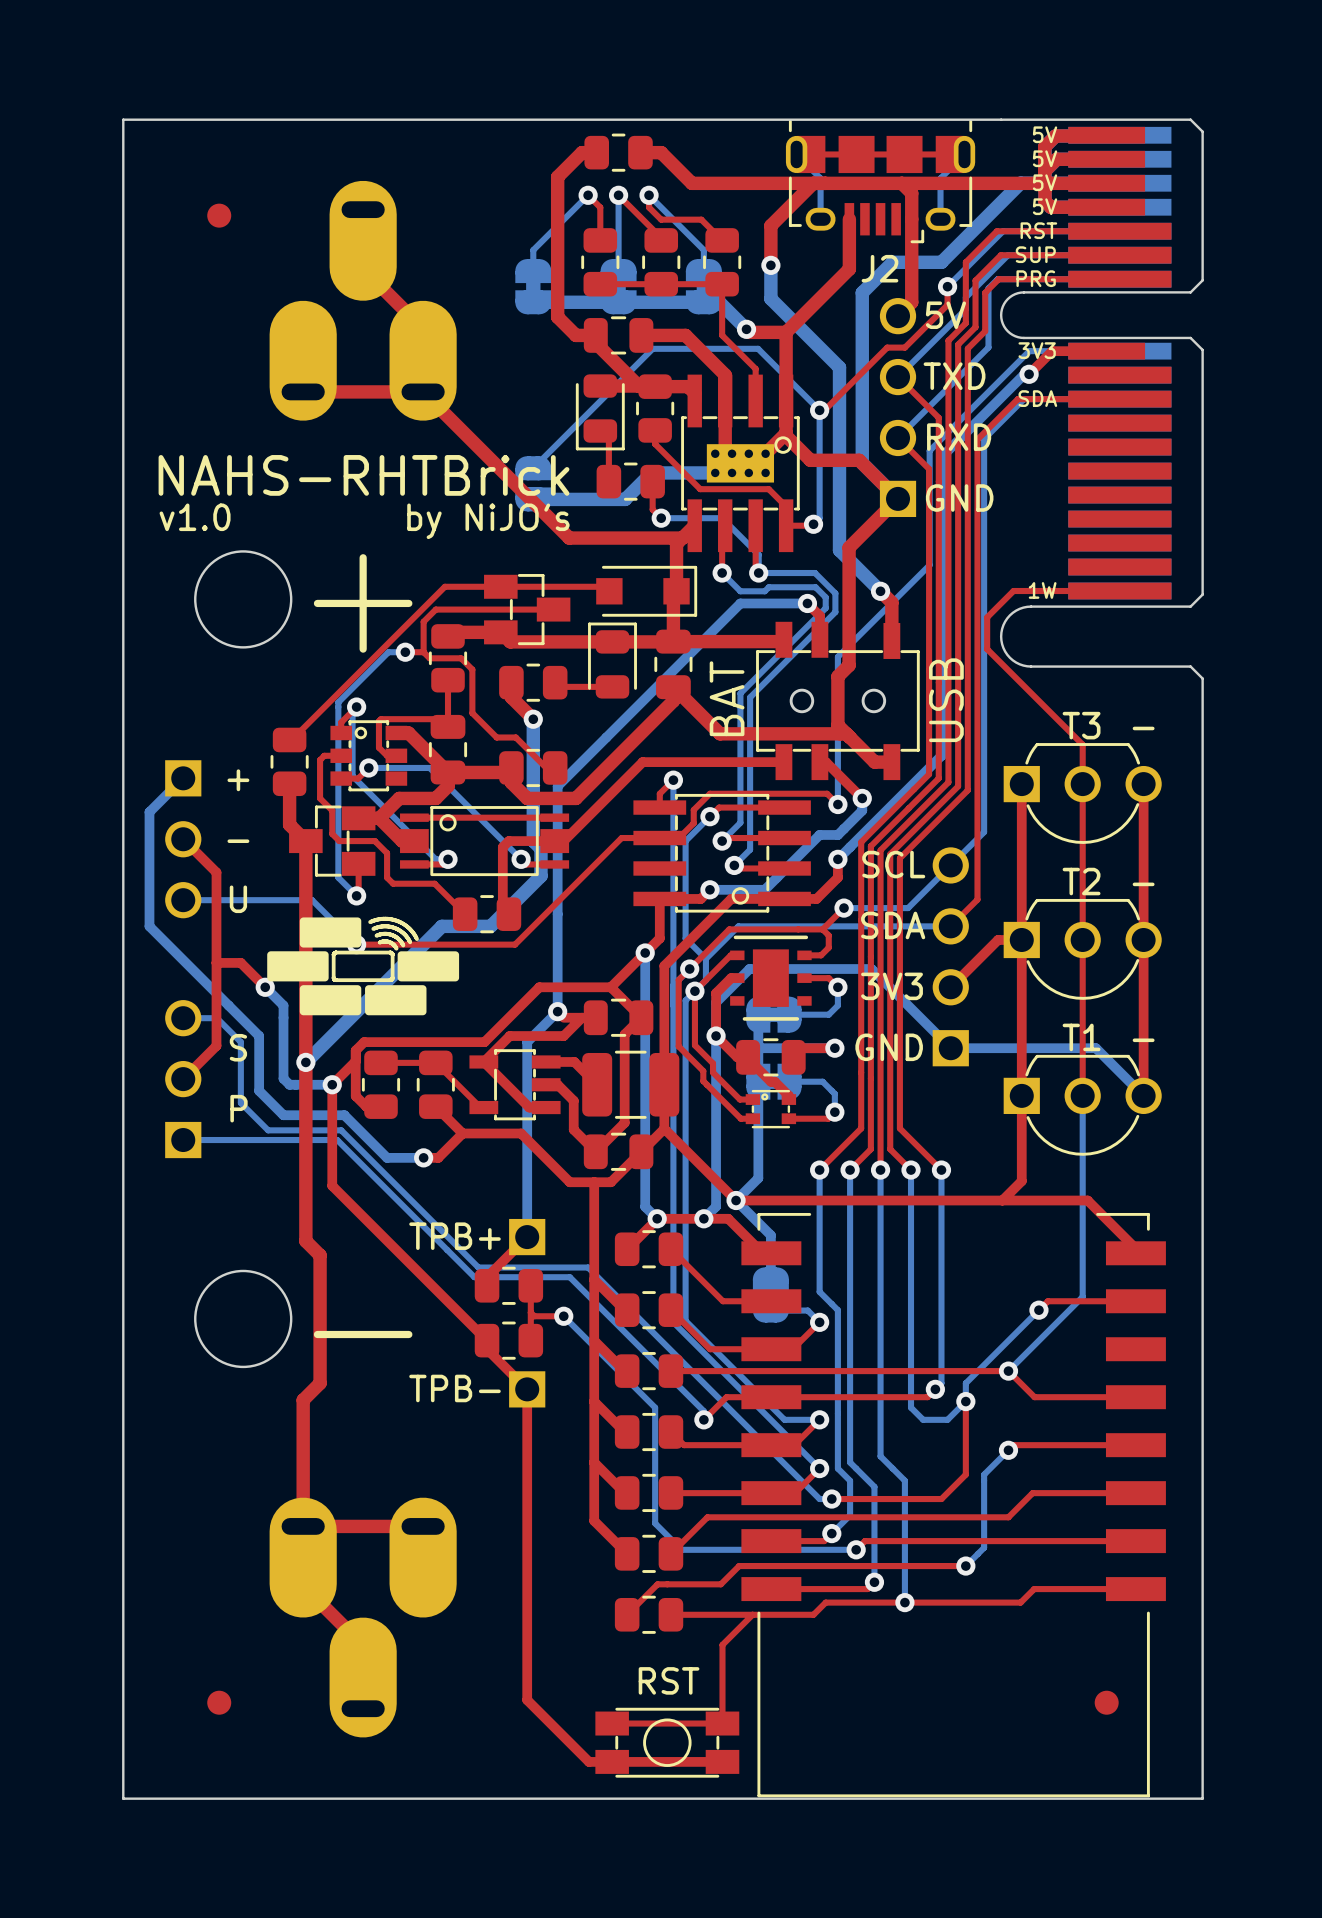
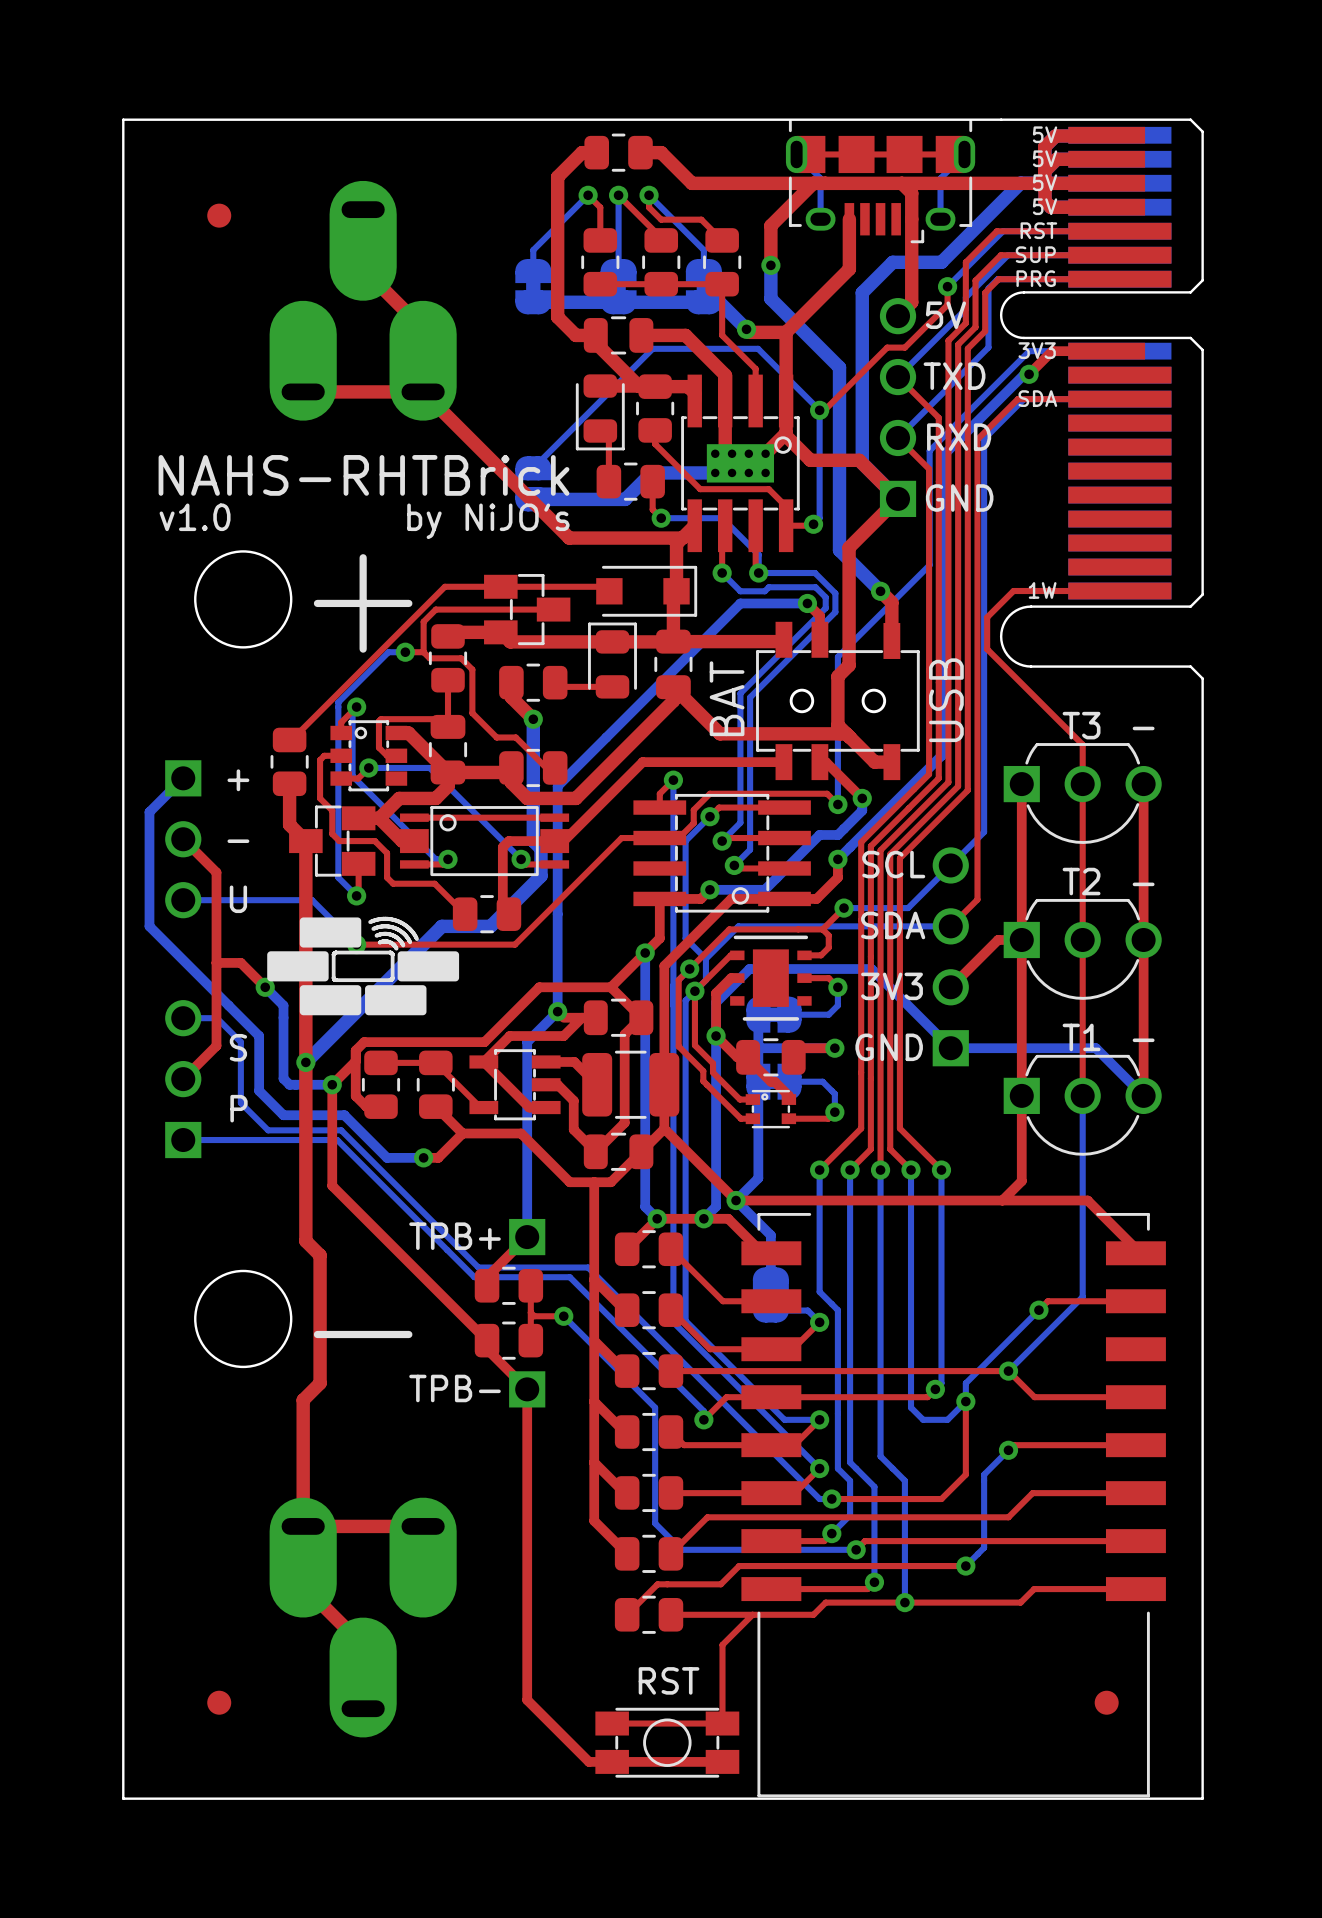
J2 name: J2 (879, 268) -> none

